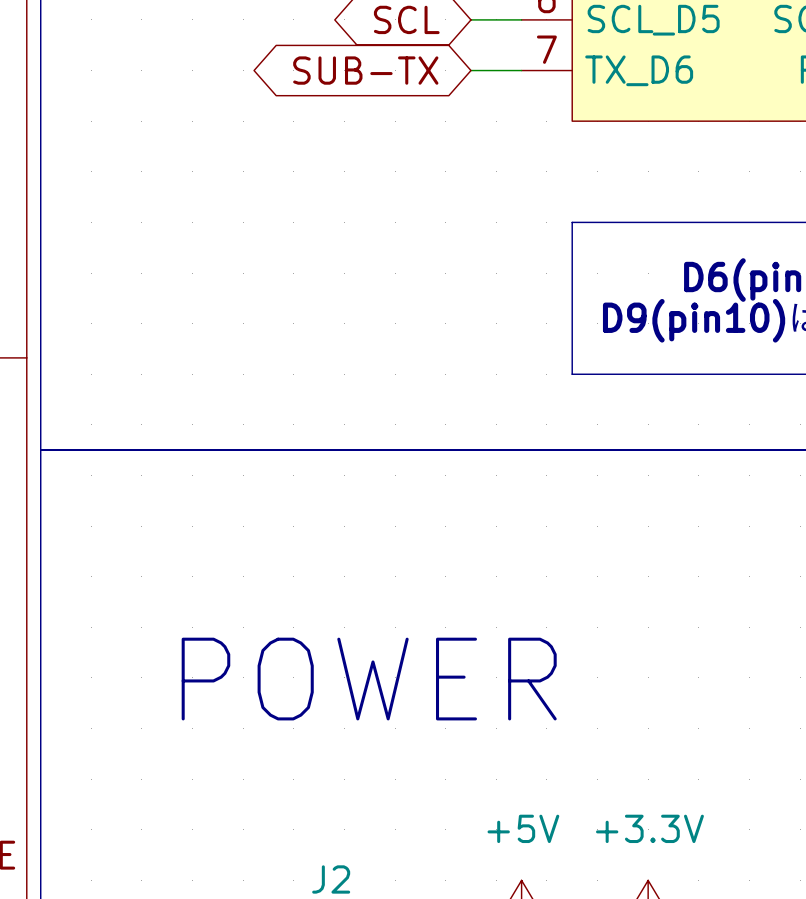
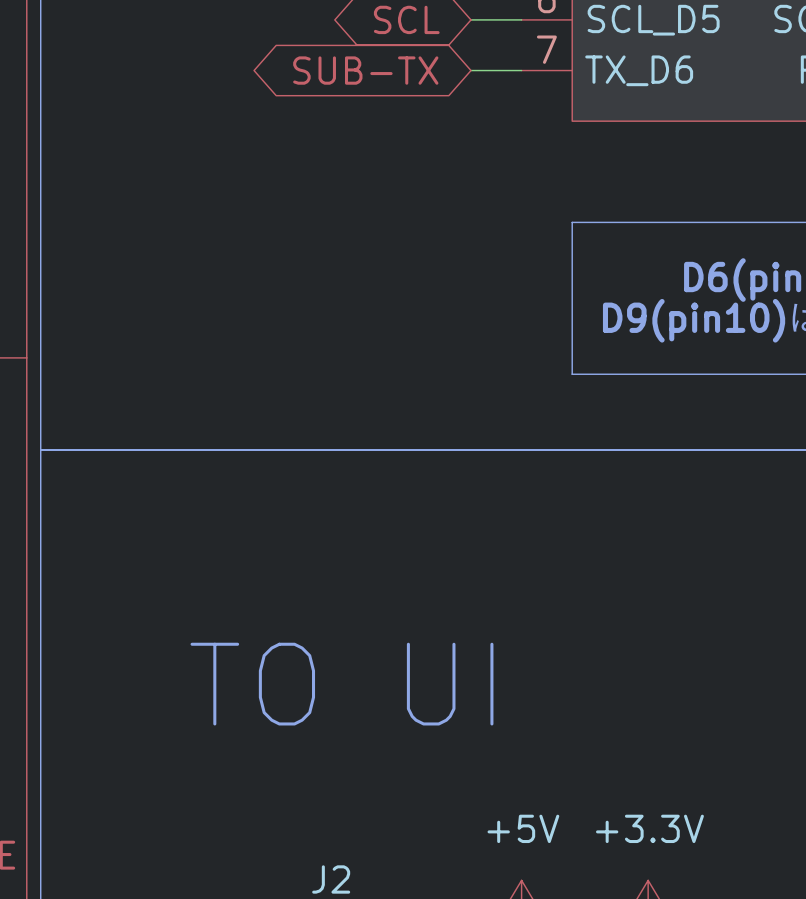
text: POWER (369, 679) -> none
text: none -> TO UI (341, 684)

